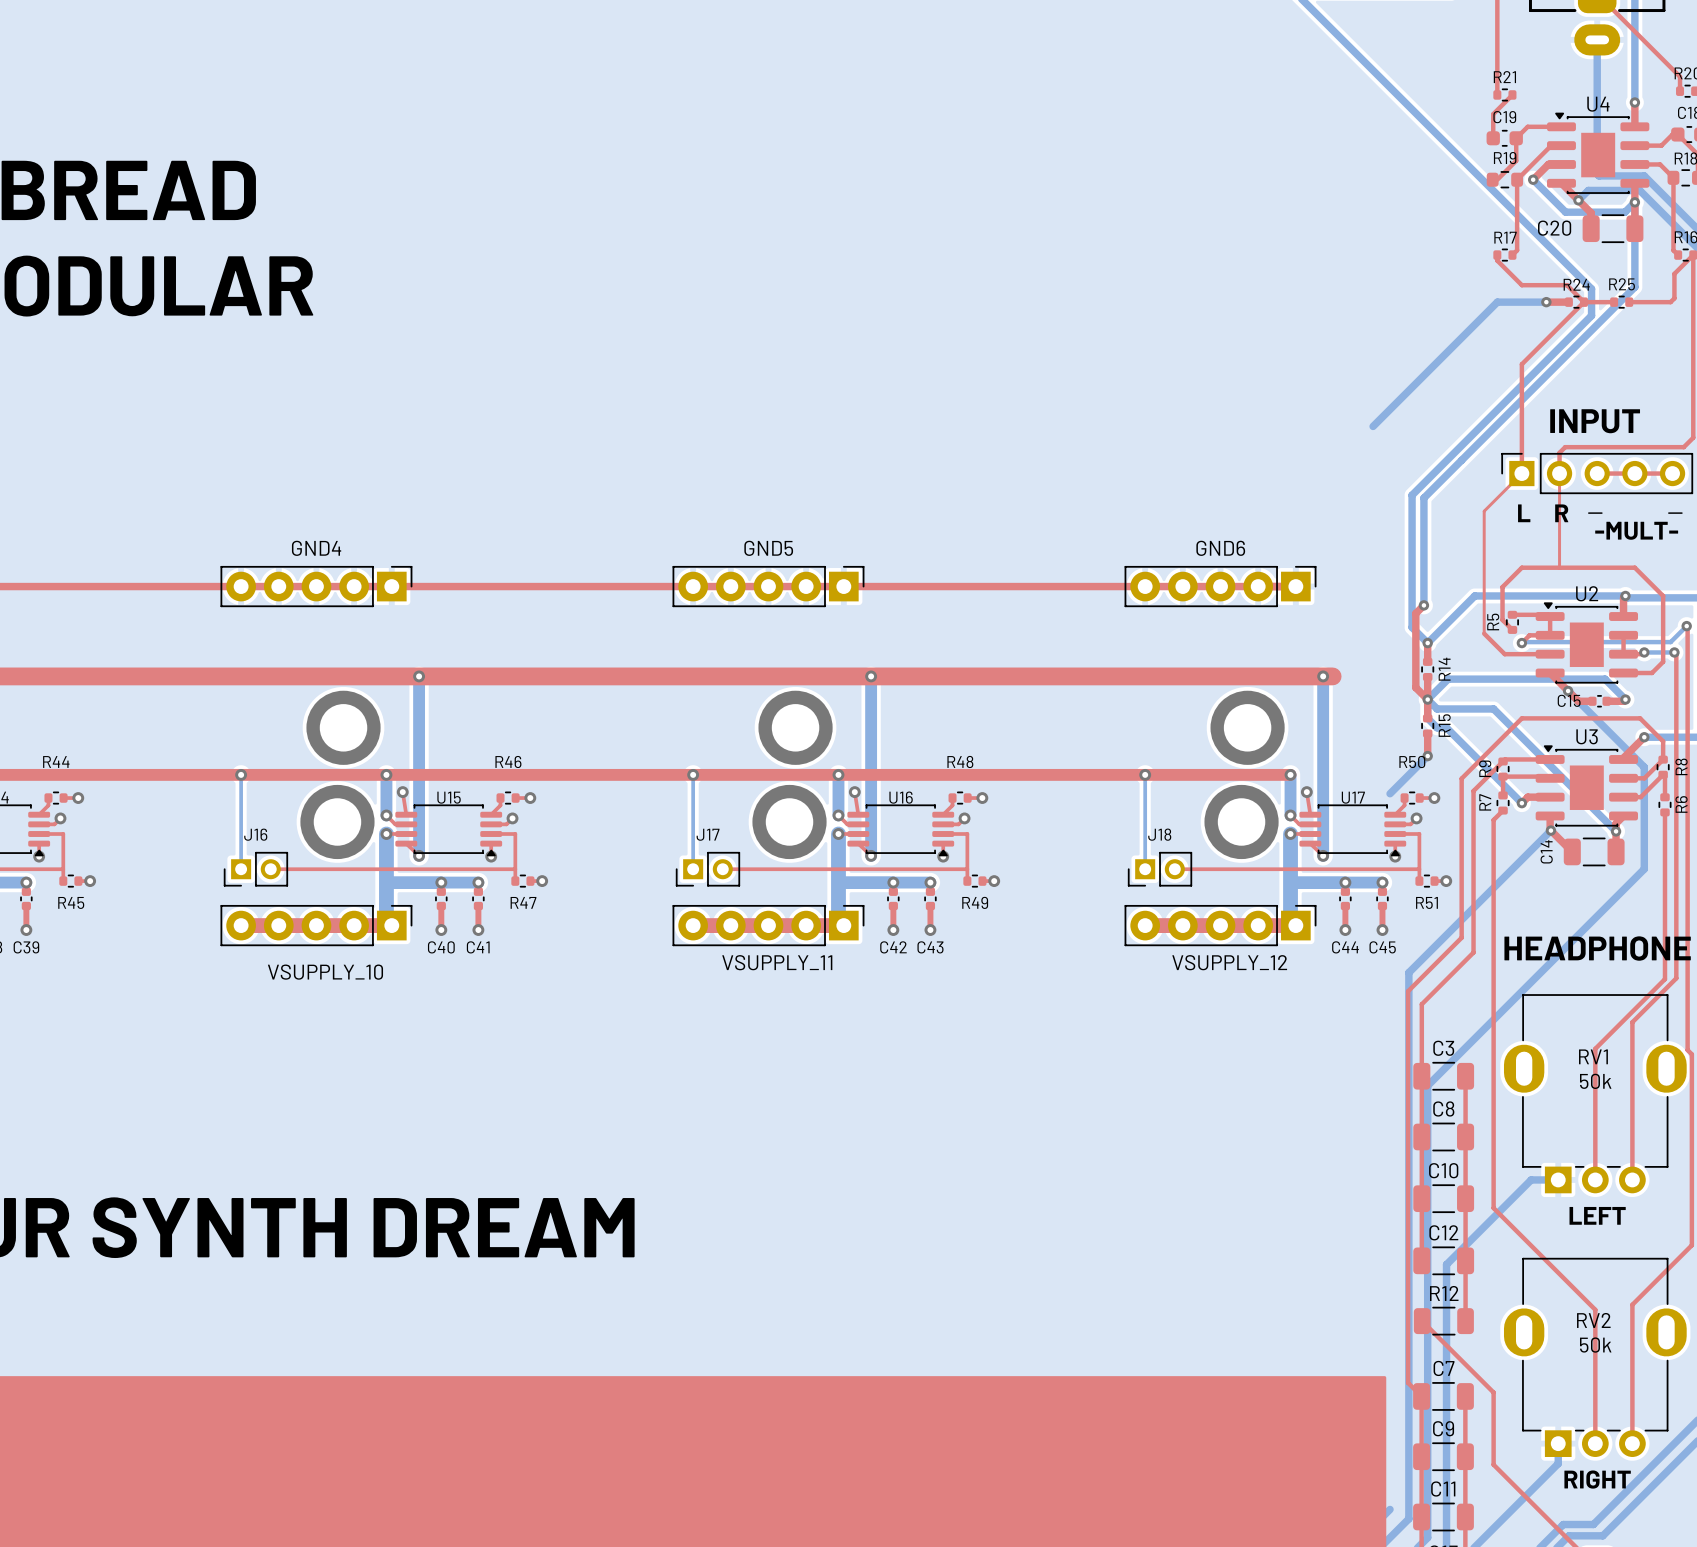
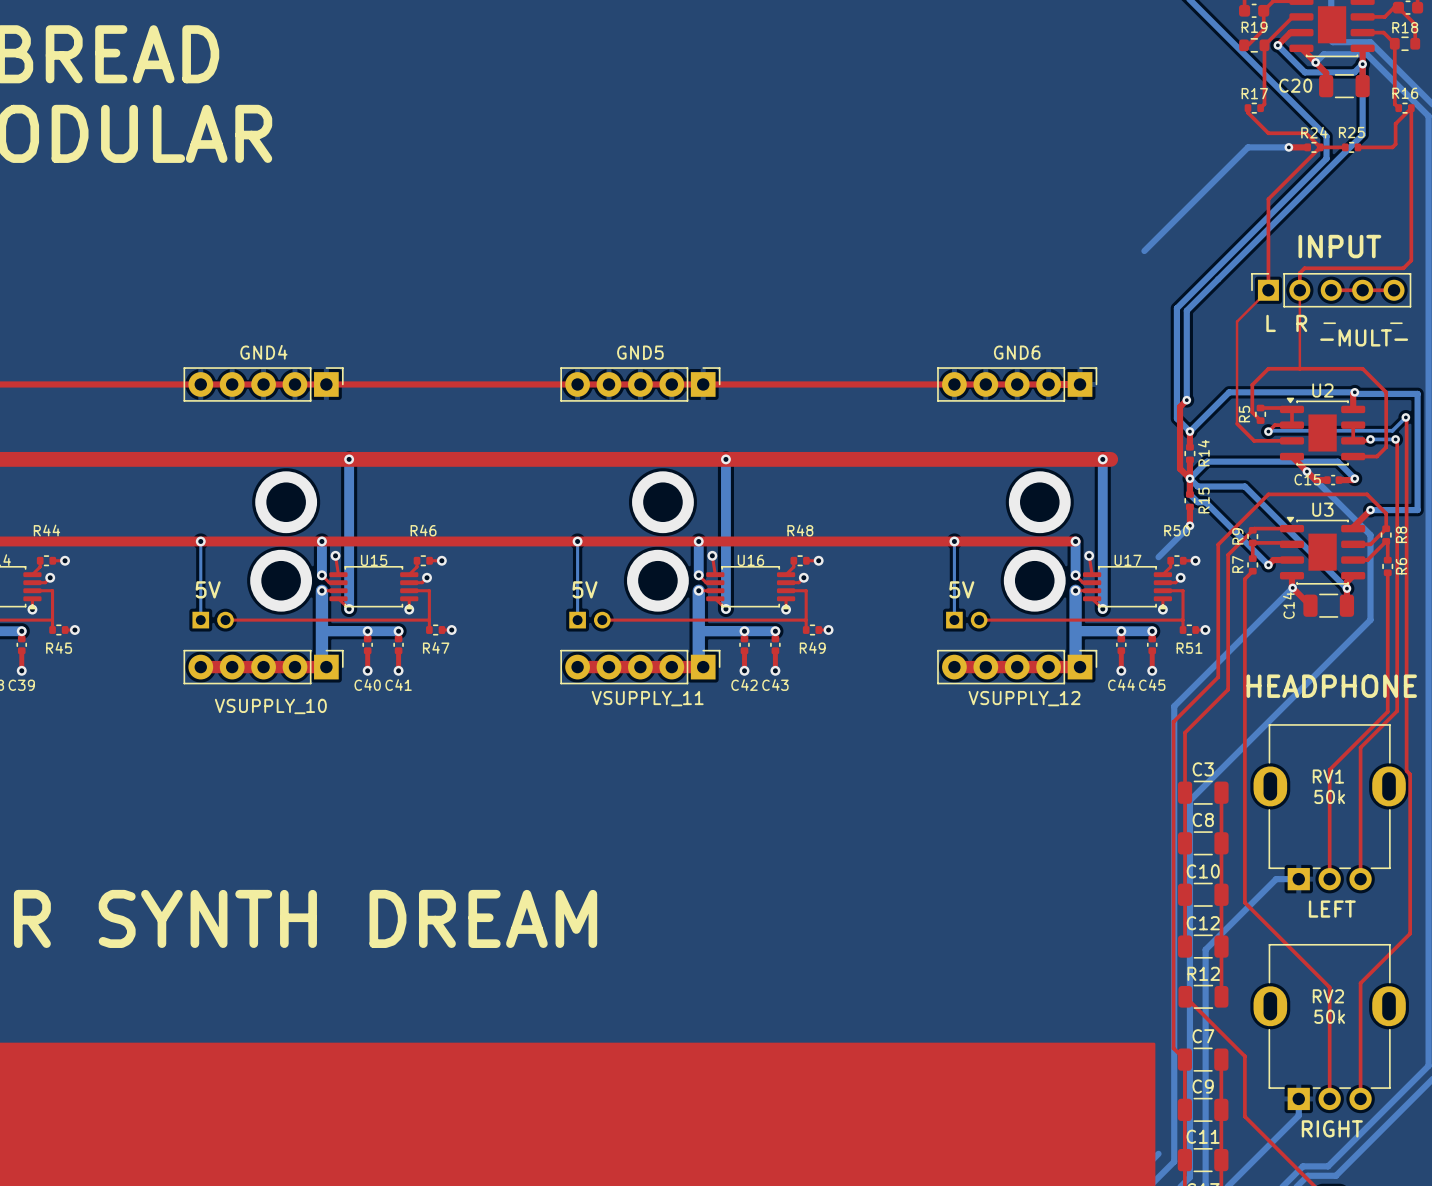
text: none -> 5V (208, 589)
text: none -> 5V (585, 589)
text: none -> 5V (961, 589)
J16: (255, 869) -> none
J17: (707, 869) -> none
J18: (1160, 869) -> none

